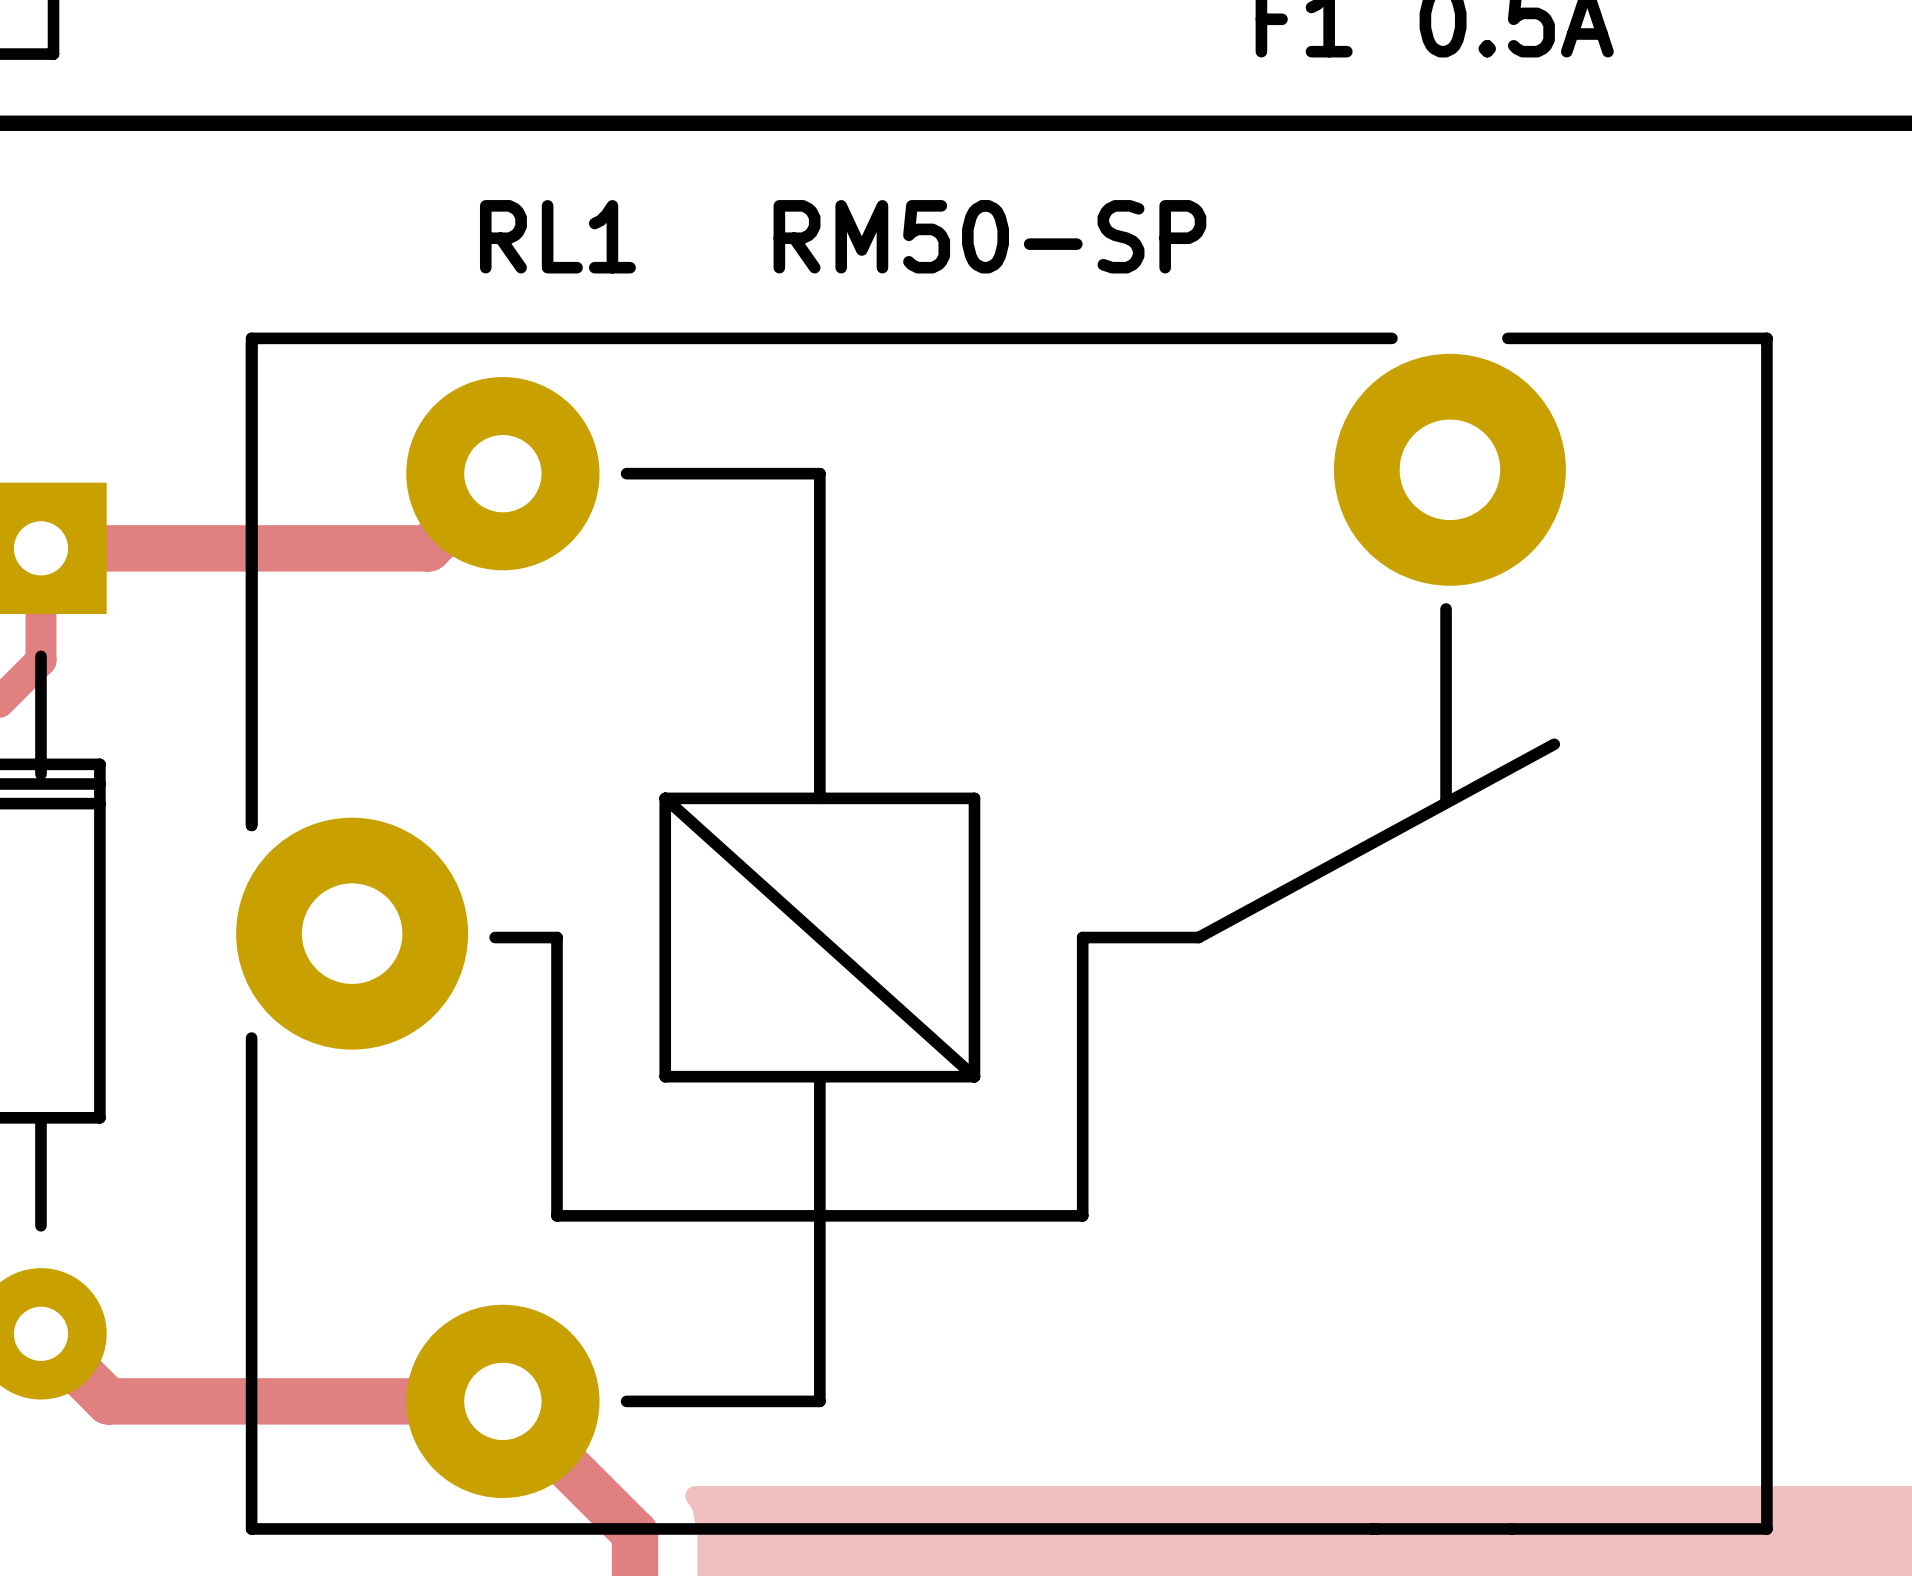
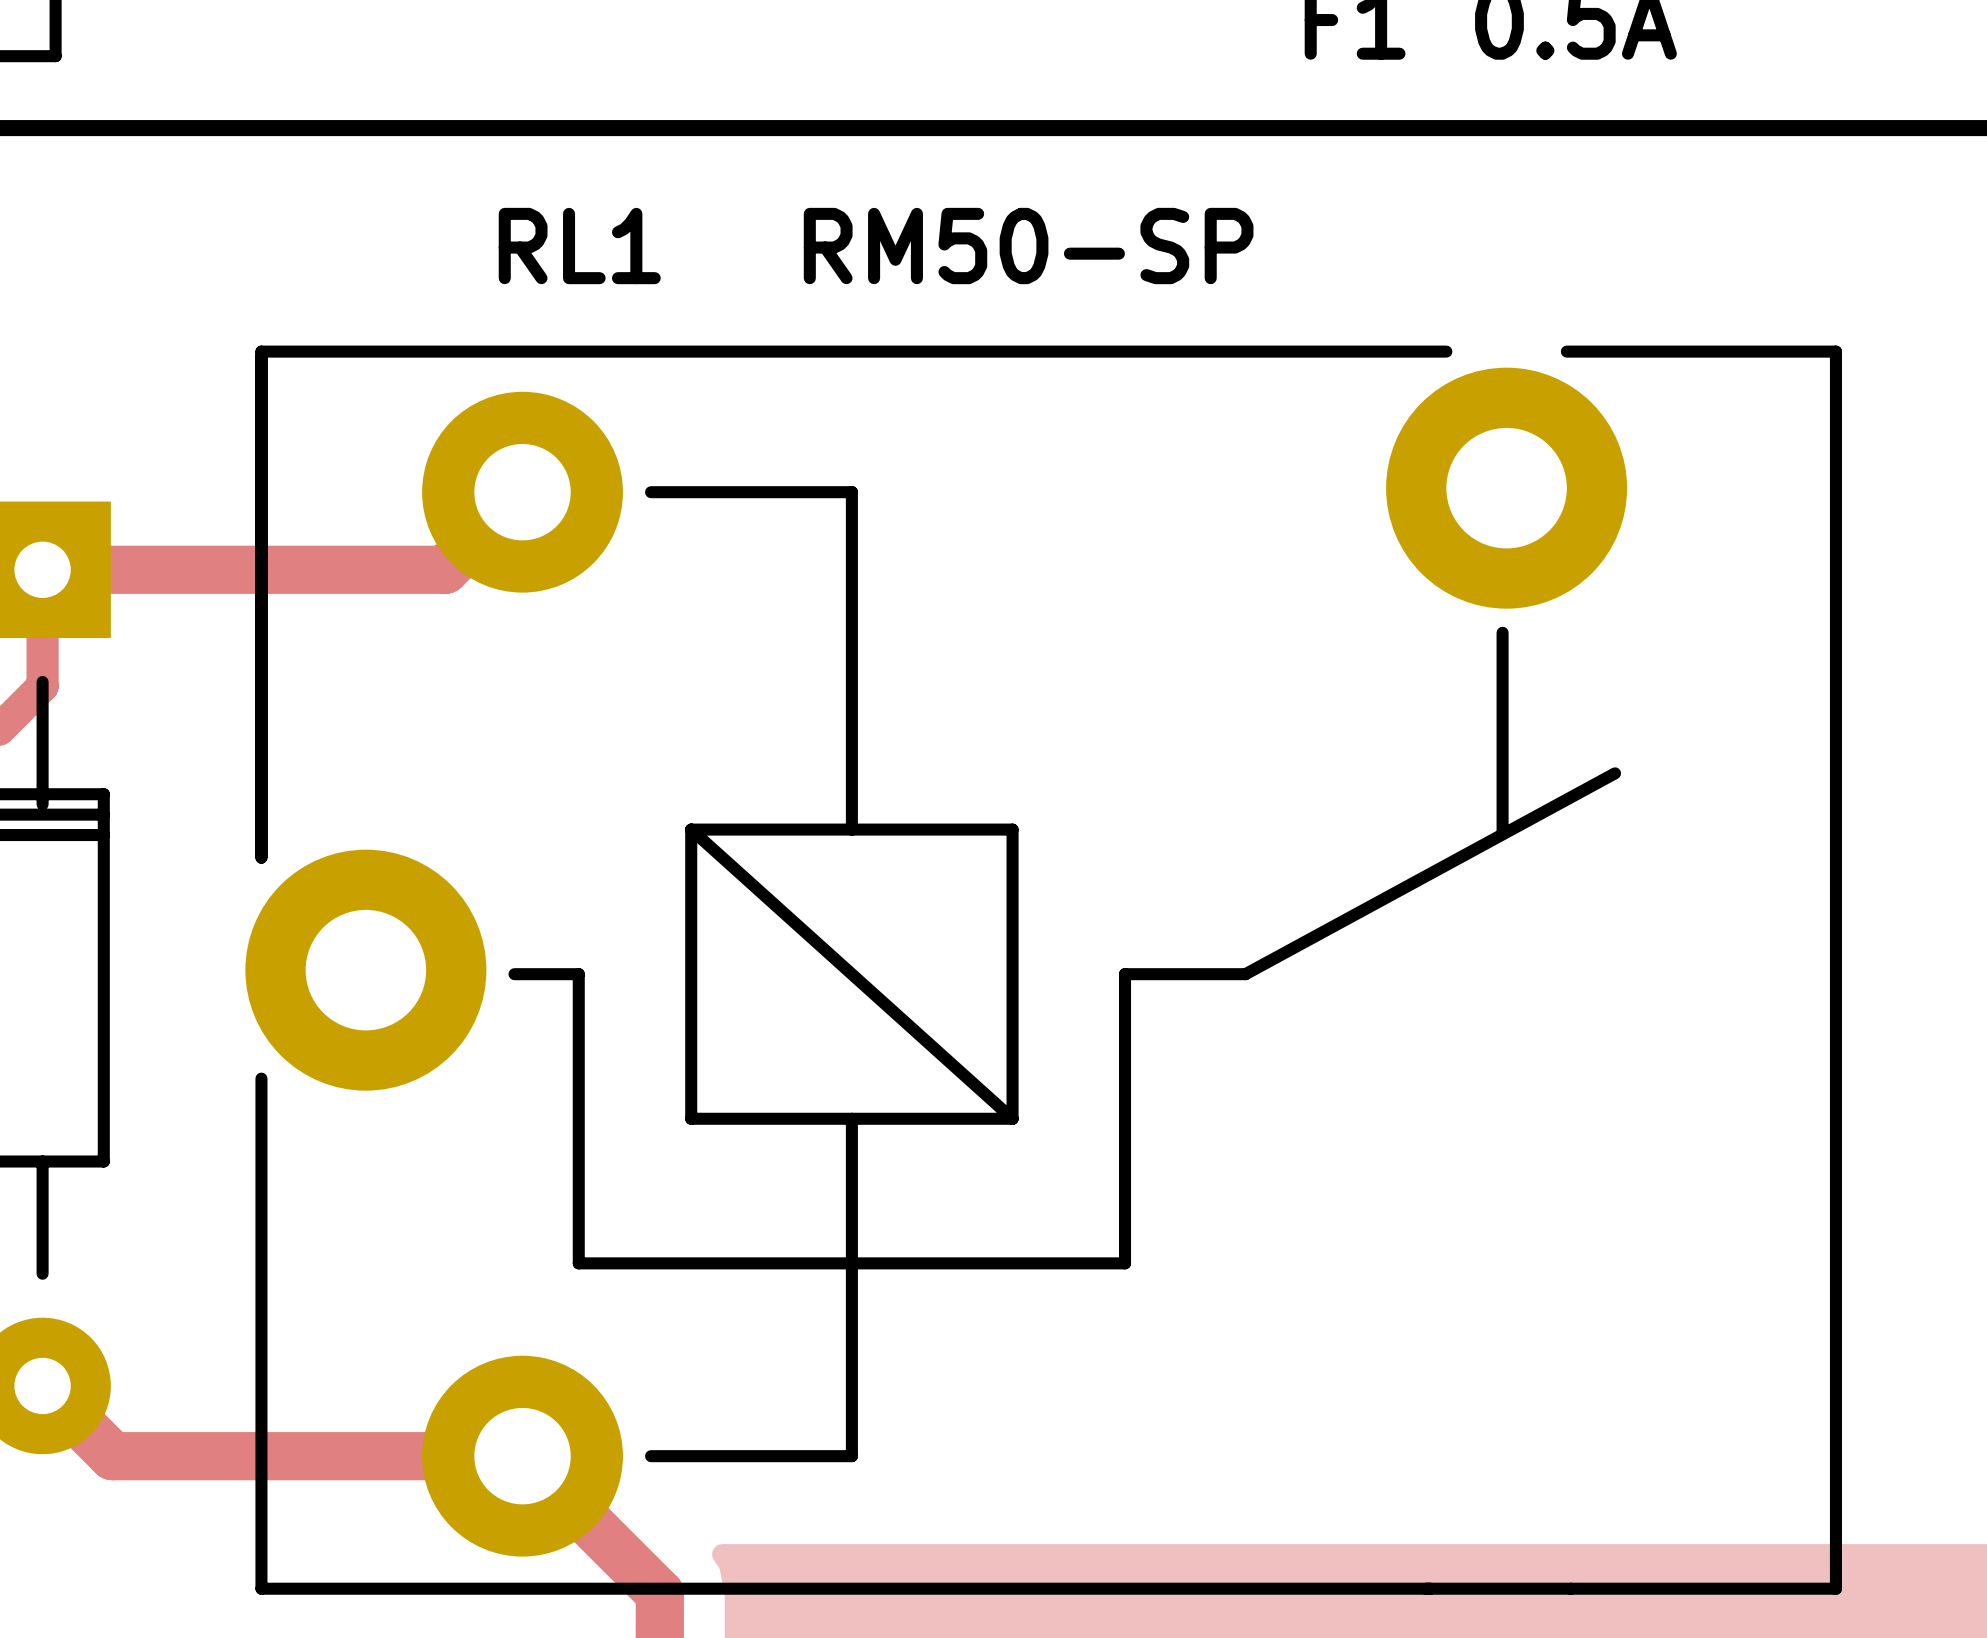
RL1 footprint: [236, 332, 1773, 1535] -> [245, 345, 1842, 1595]

